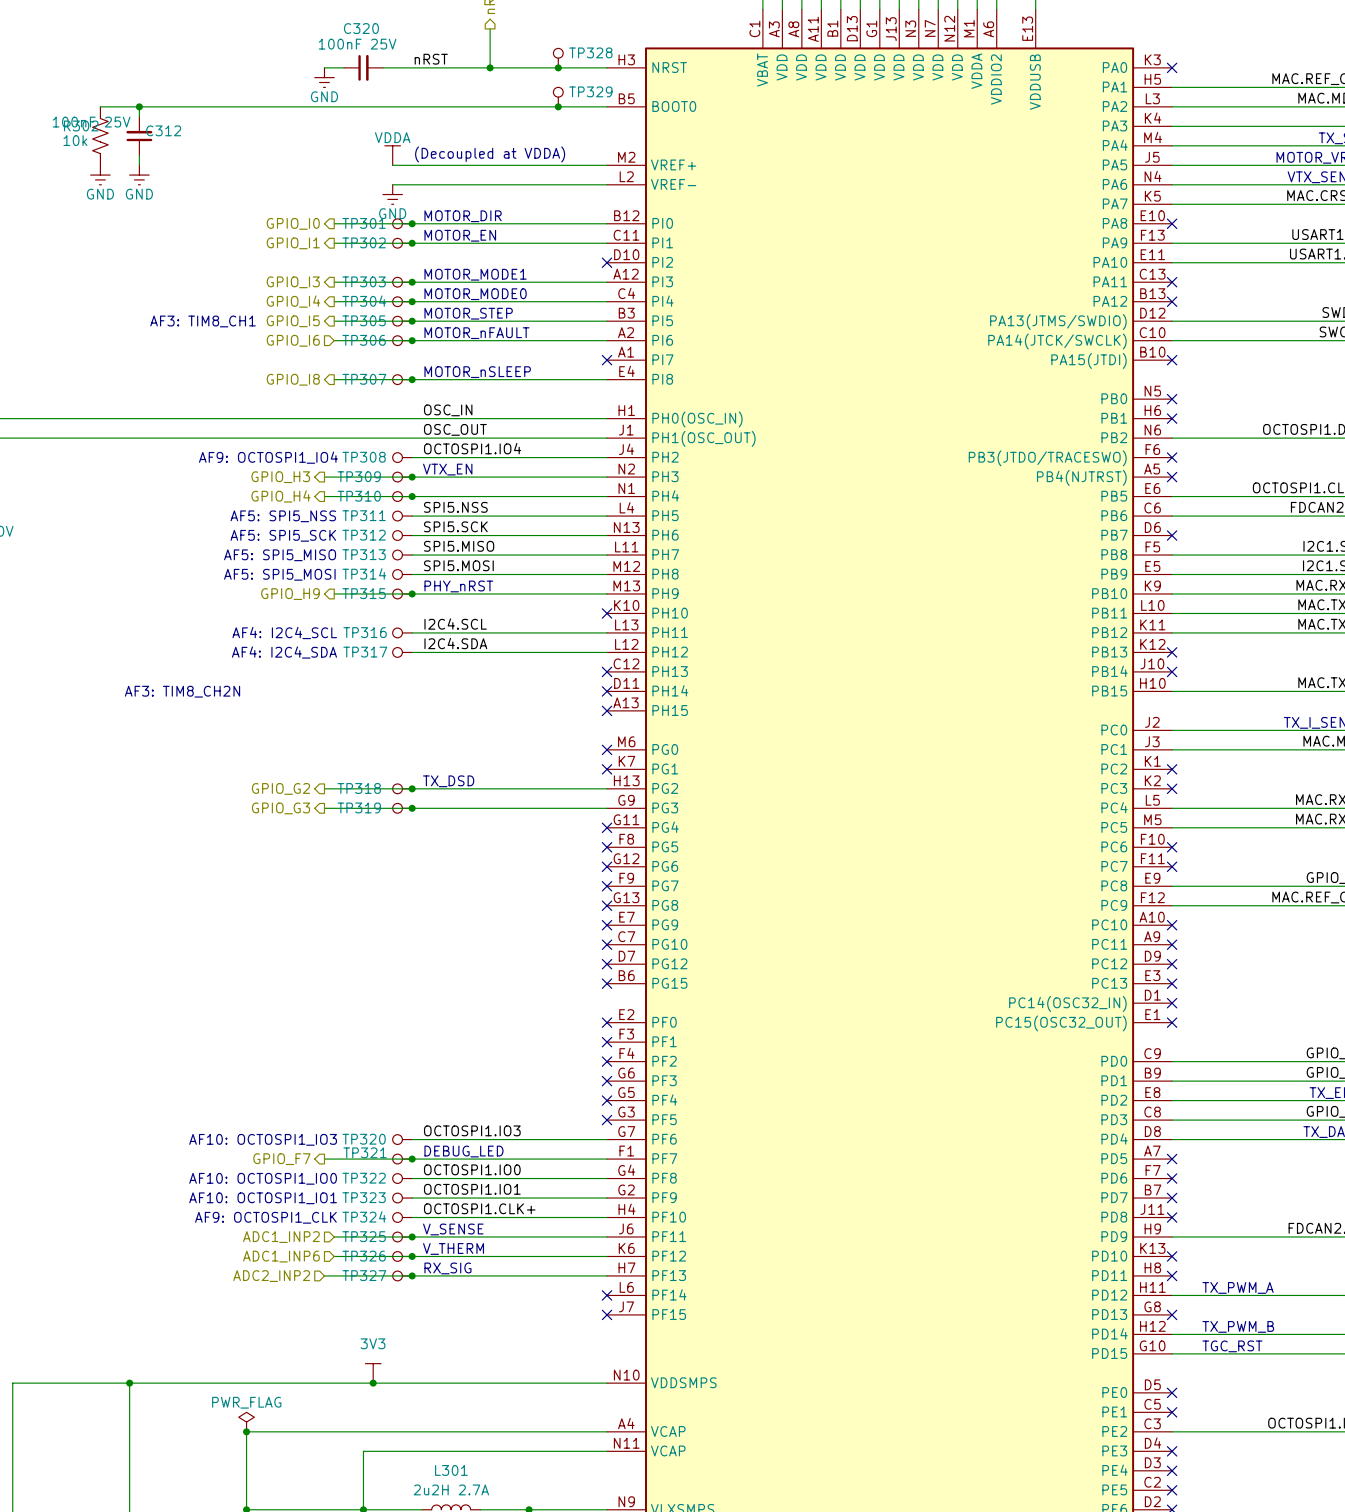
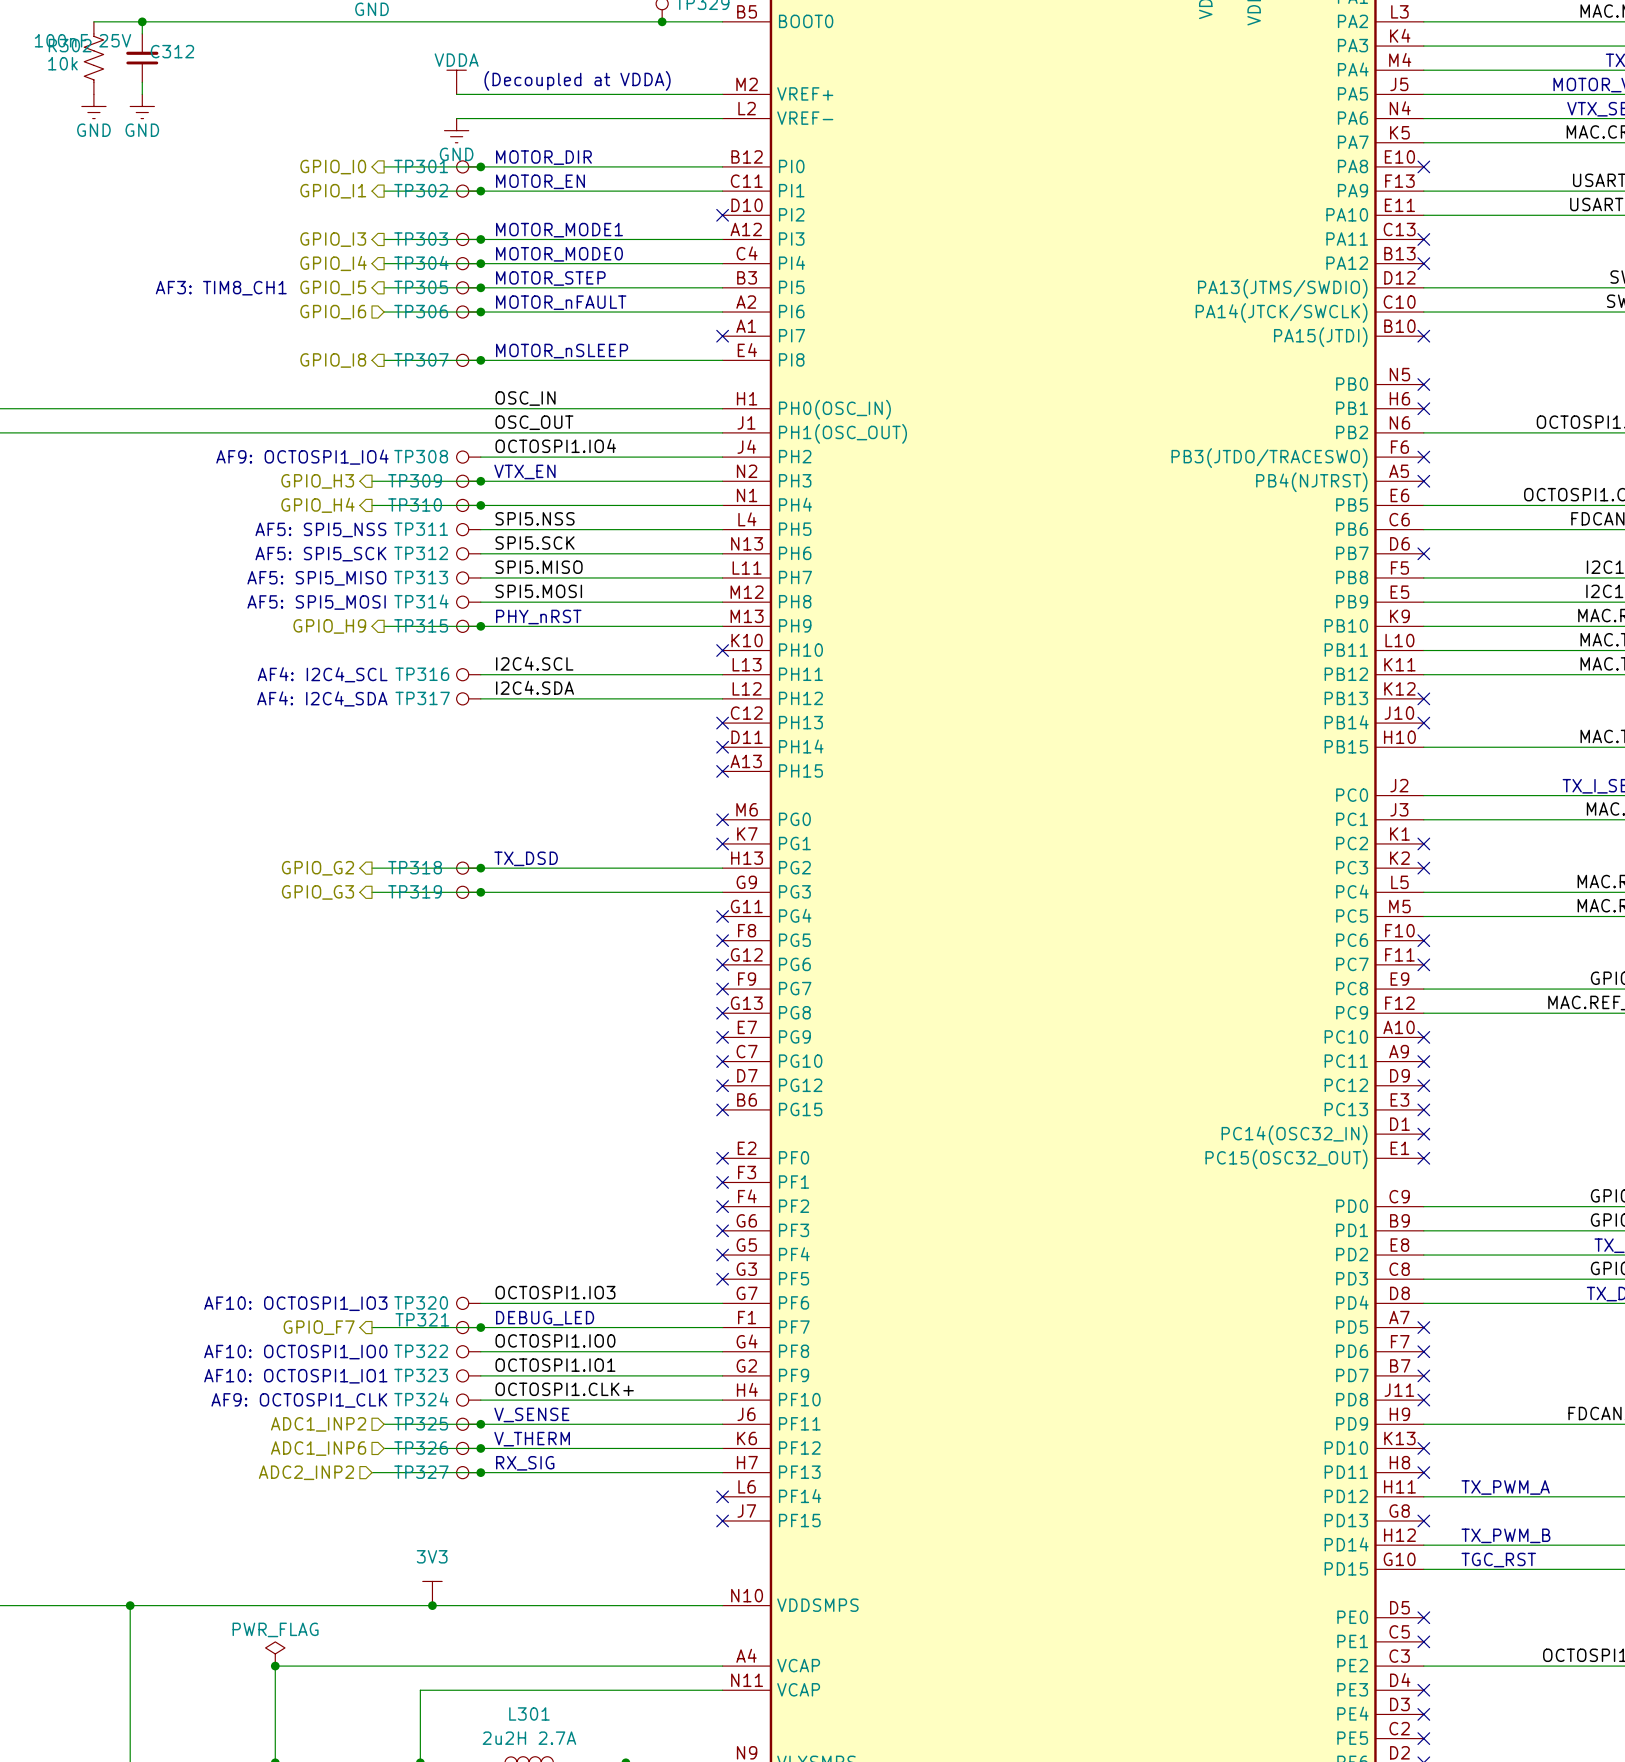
text: AF3: TIM8_CH2N (182, 691) -> none

